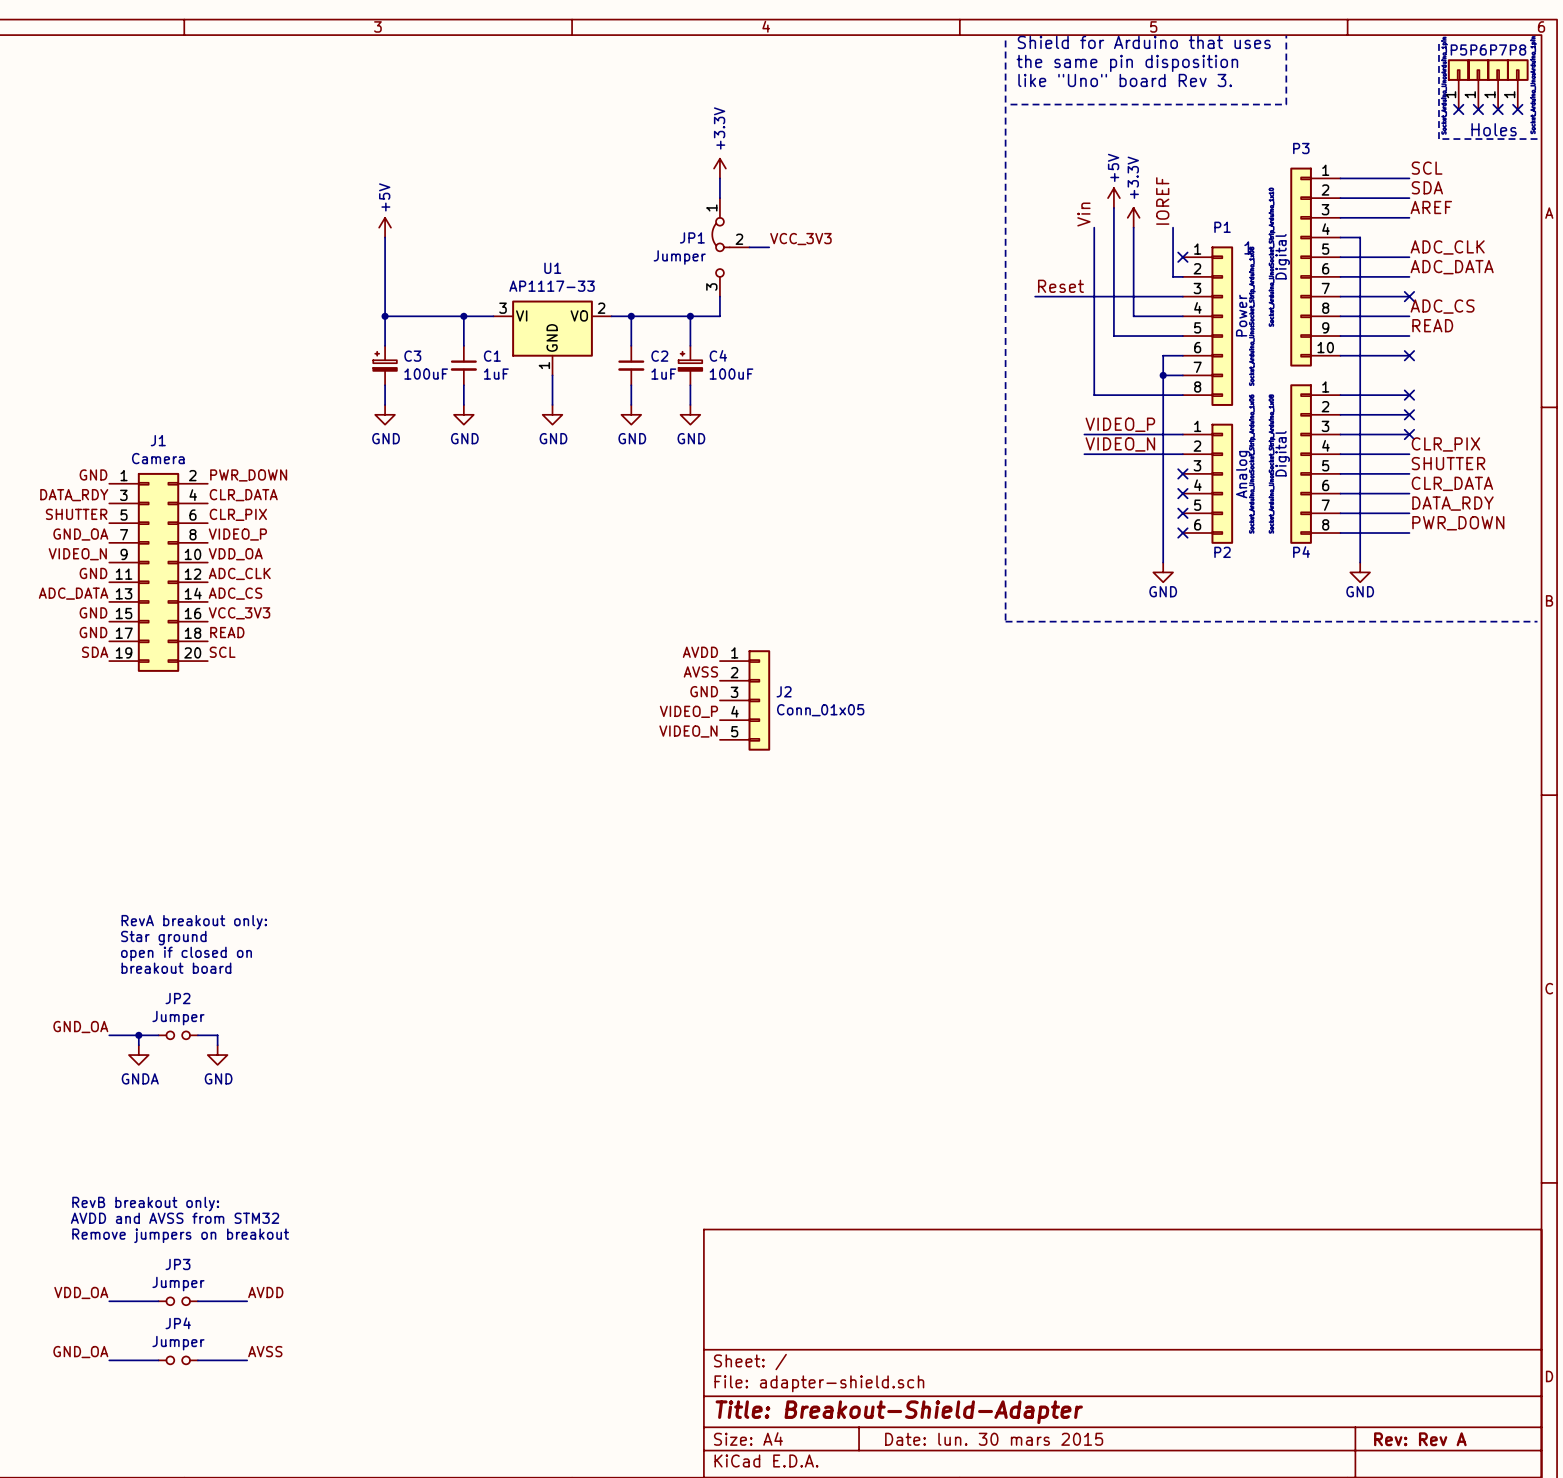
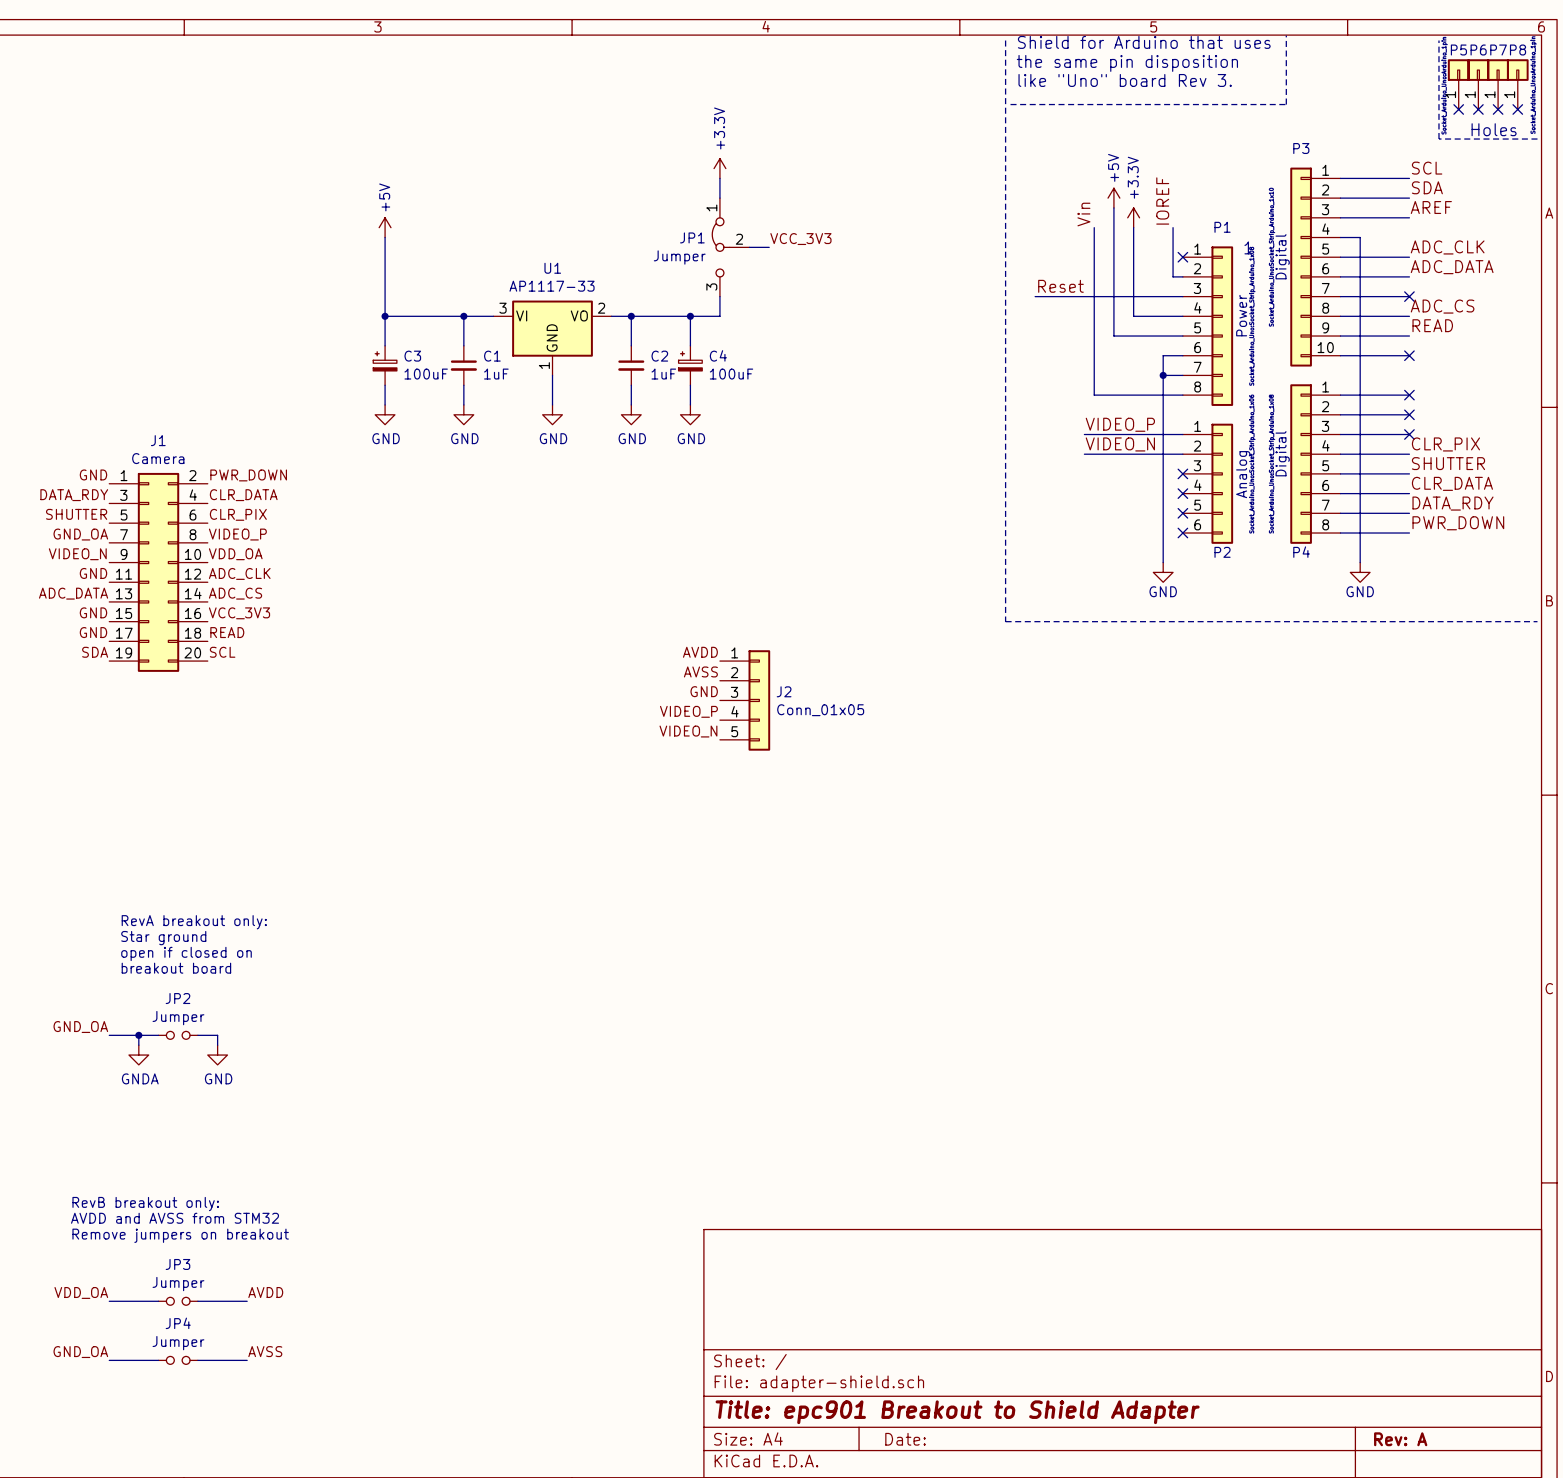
title block: Title: Breakout-Shield-Adapter (899, 1412) -> Title: epc901 Breakout to Shield Adapter (957, 1412)
title block: Date: lun. 30 mars 2015 (994, 1439) -> Date: (905, 1439)
title block: Rev: Rev A (1420, 1439) -> Rev: A (1400, 1439)

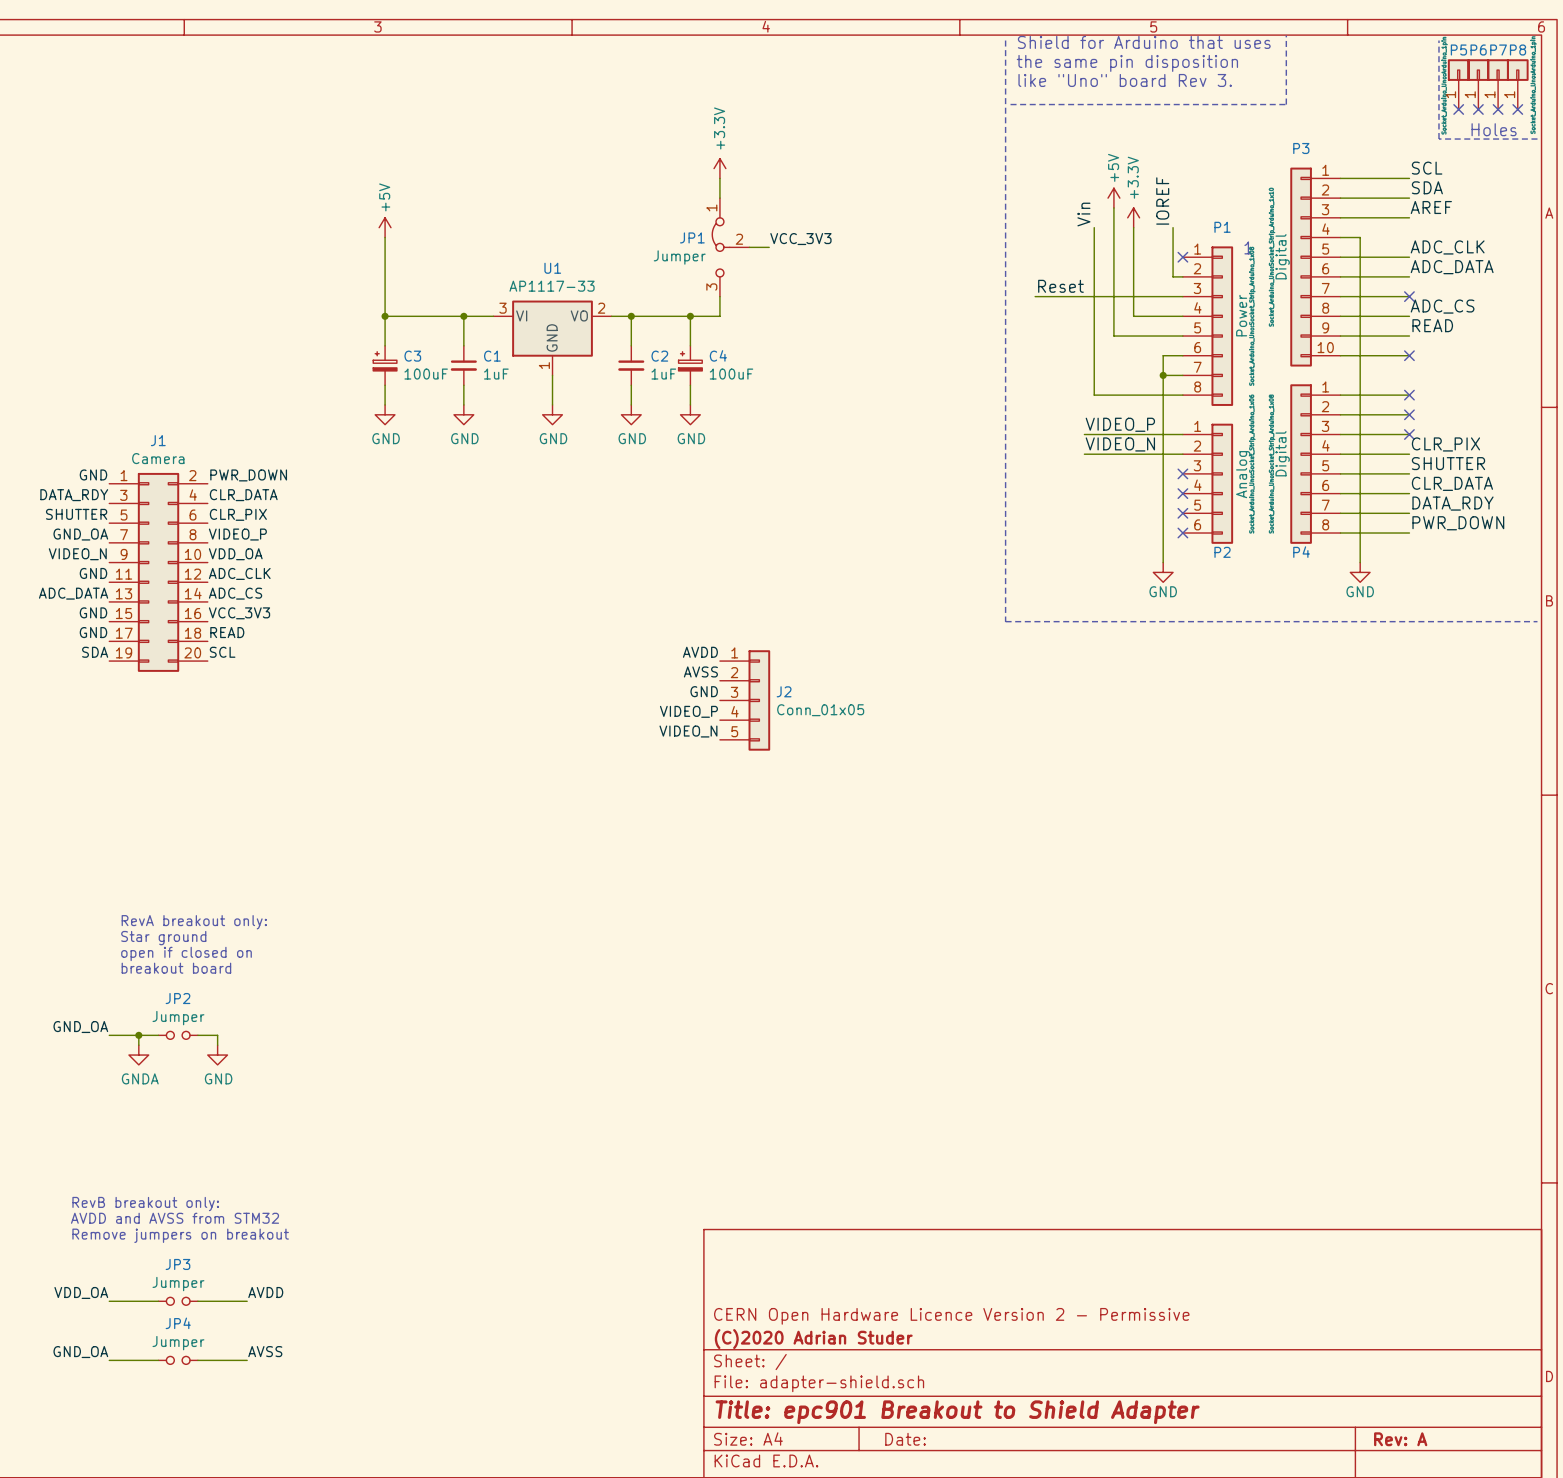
title block: none -> CERN Open Hardware Licence Version 2 - Permissive (951, 1316)
title block: none -> (C)2020 Adrian Studer (813, 1339)

